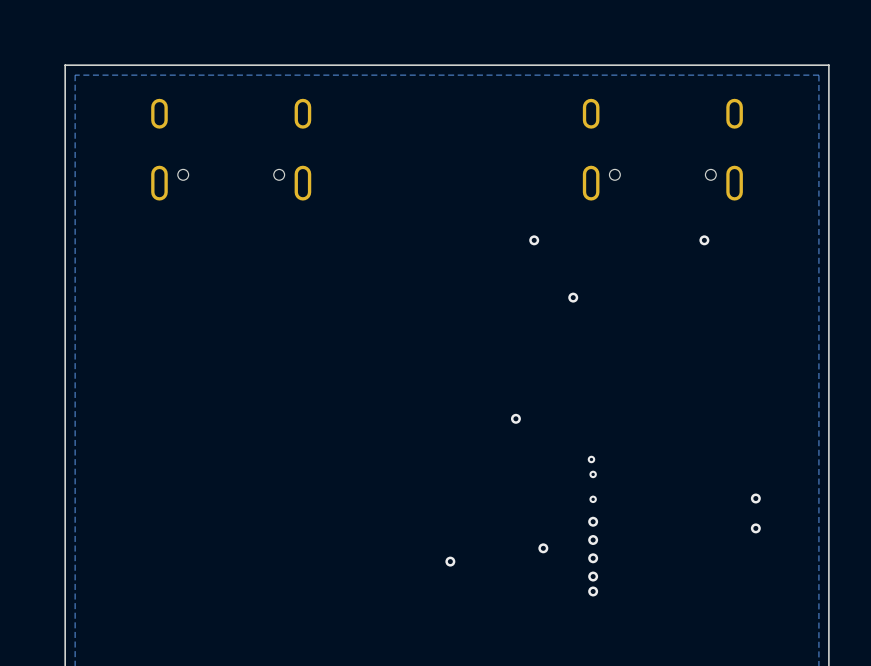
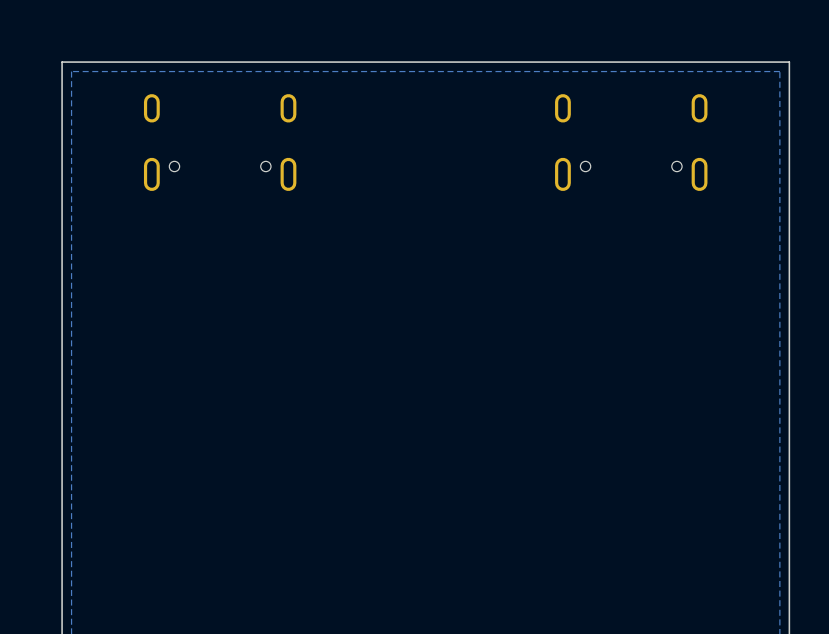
via: (534, 240) -> none
via: (704, 240) -> none
via: (573, 297) -> none
via: (515, 418) -> none
via: (591, 459) -> none
via: (593, 474) -> none
via: (755, 498) -> none
via: (593, 499) -> none
via: (593, 521) -> none
via: (755, 528) -> none
via: (593, 540) -> none
via: (543, 548) -> none
via: (593, 558) -> none
via: (450, 561) -> none
via: (593, 576) -> none
via: (593, 591) -> none

